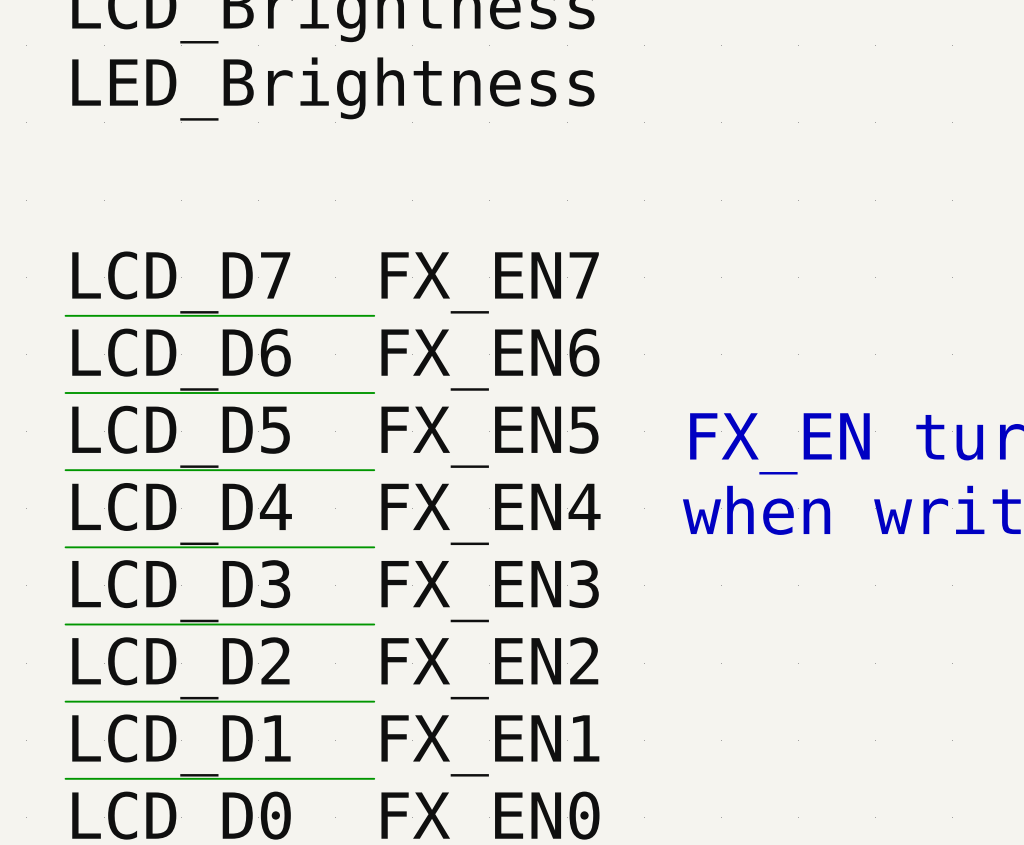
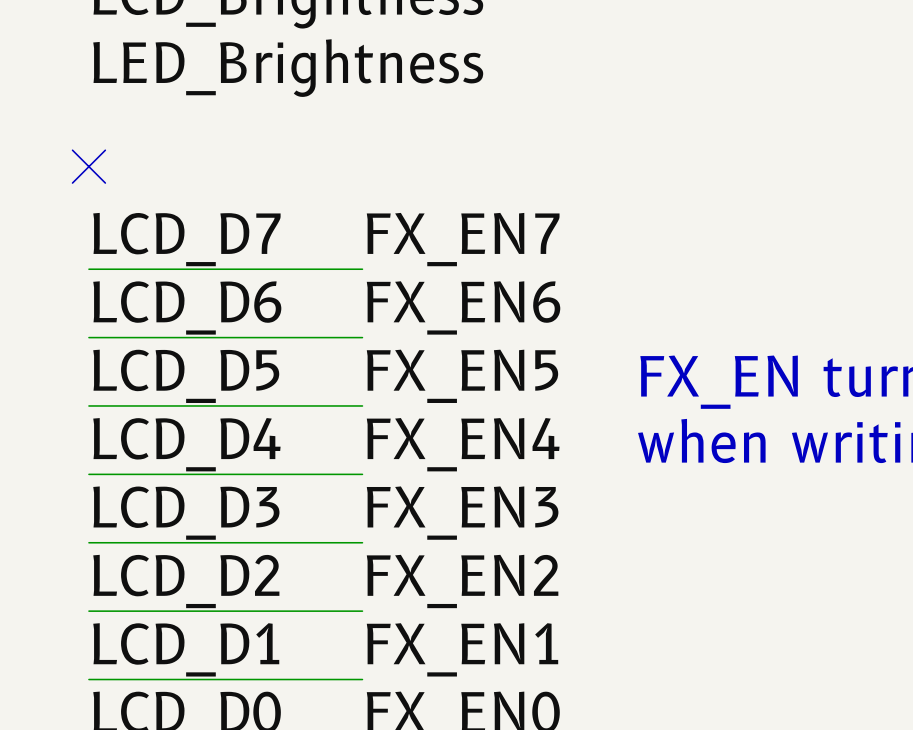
no-connect mark: none -> (88, 166)

